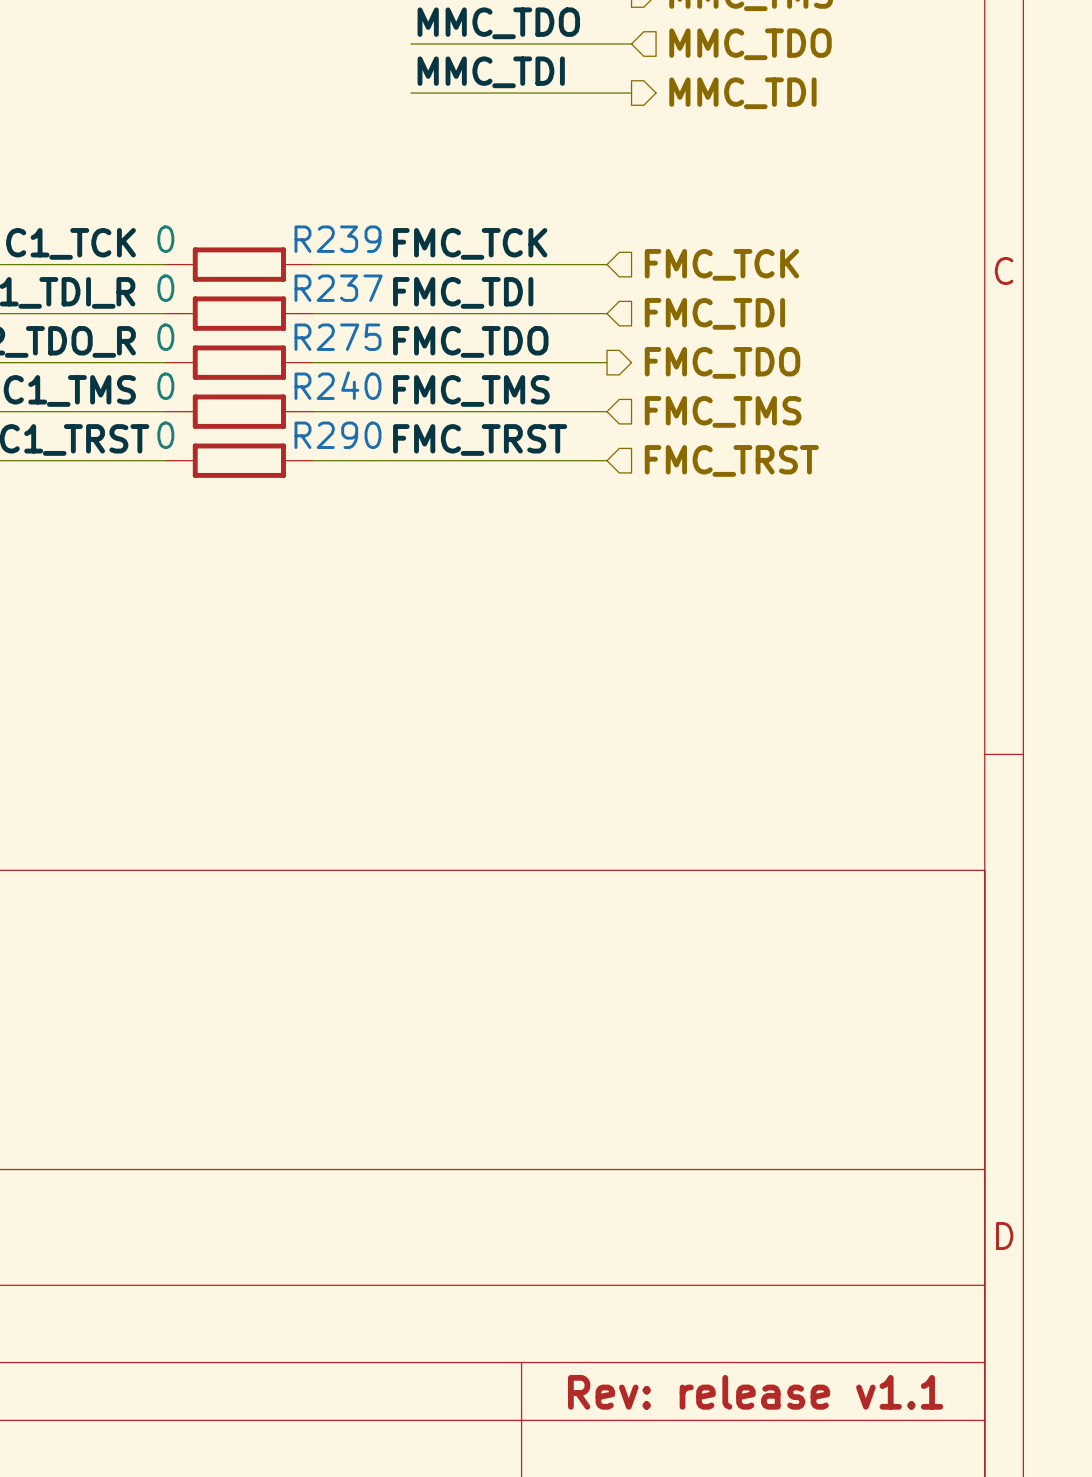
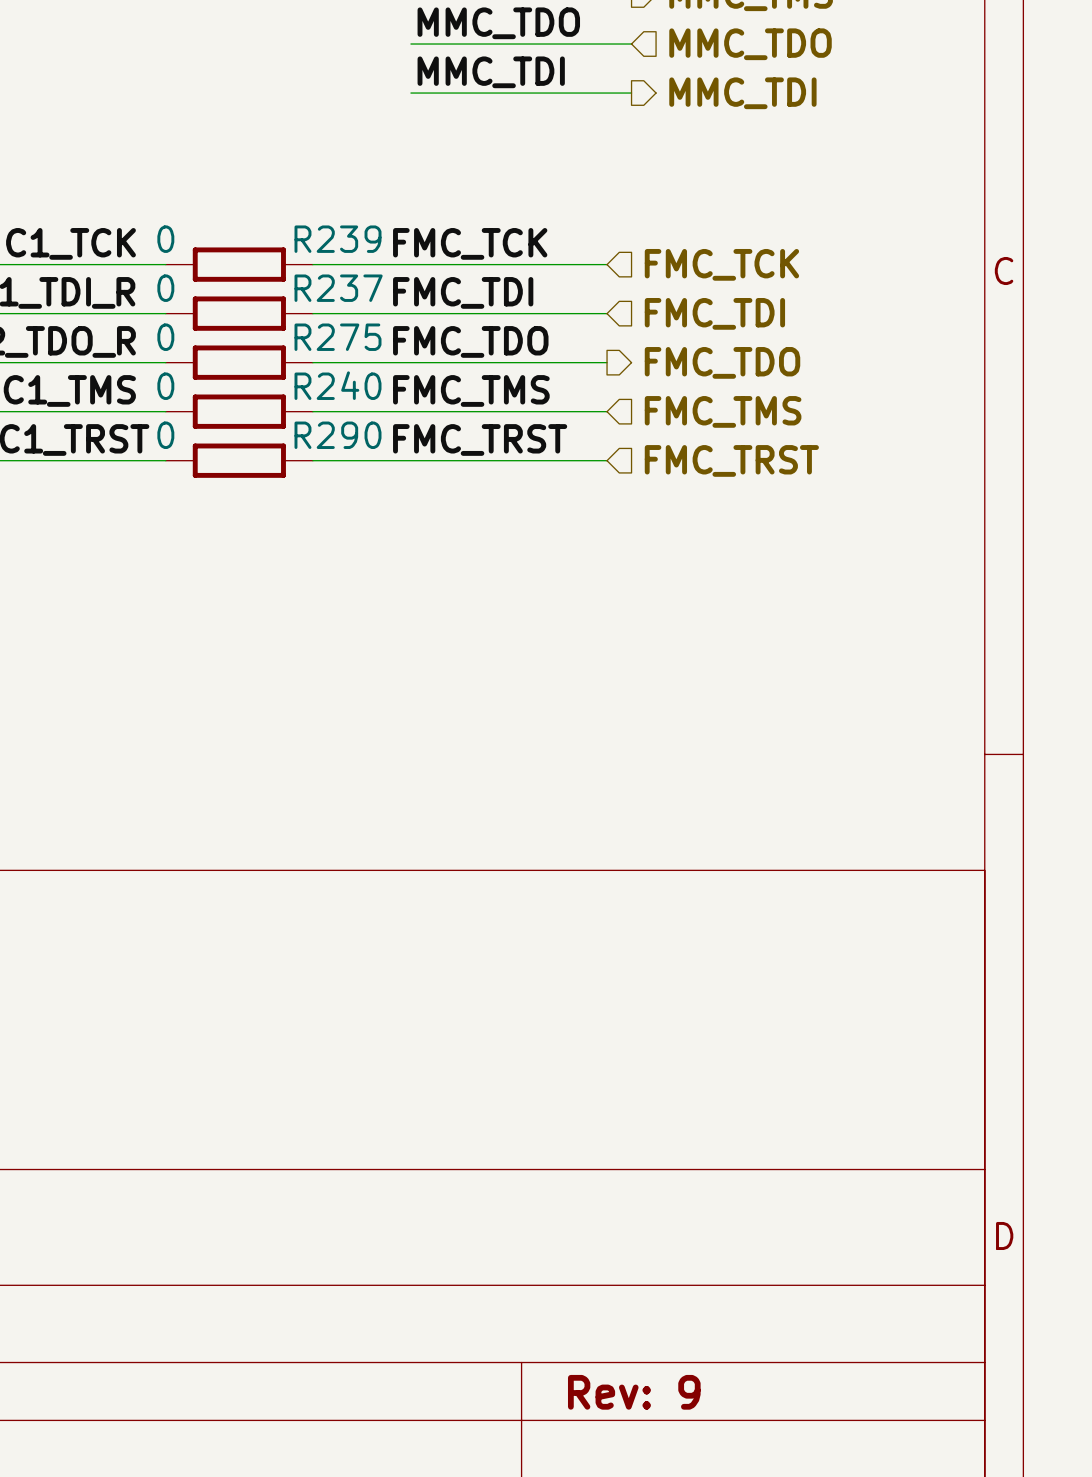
title block: Rev: release v1.1 (755, 1392) -> Rev: 9 (634, 1392)

